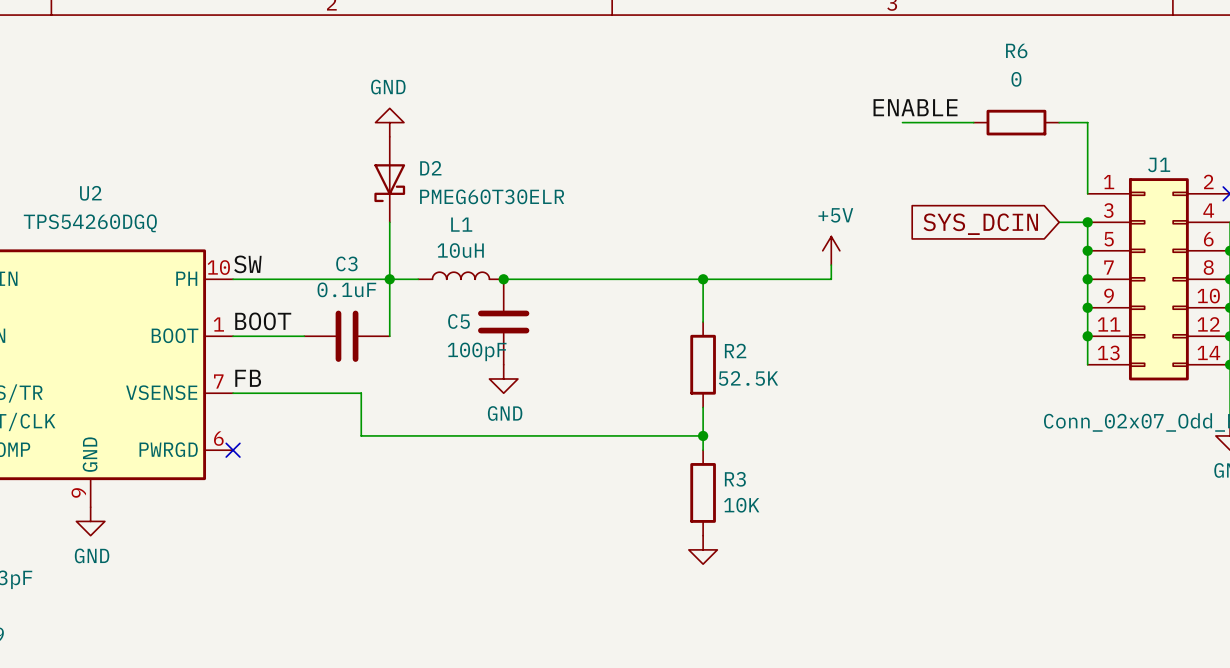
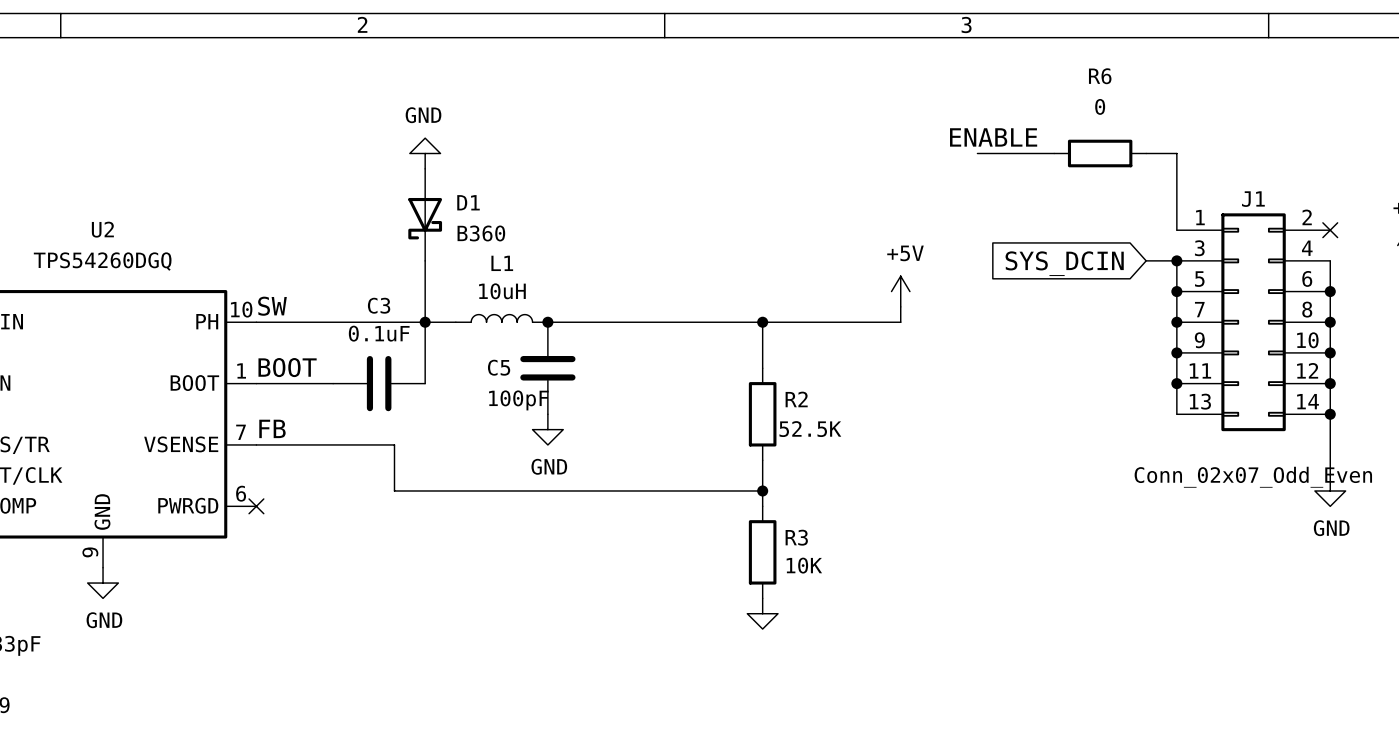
D2: PMEG60T30ELR (389, 179) -> none
D1: none -> B360 (425, 214)

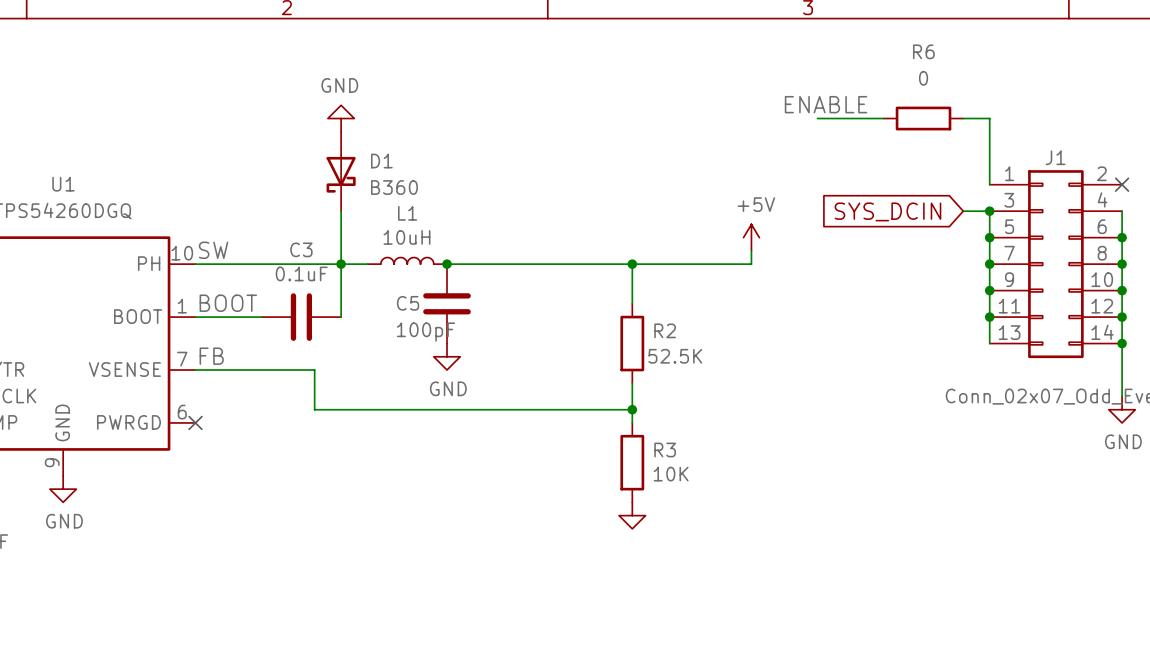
U2 name: U2 (102, 229) -> U1 (63, 184)

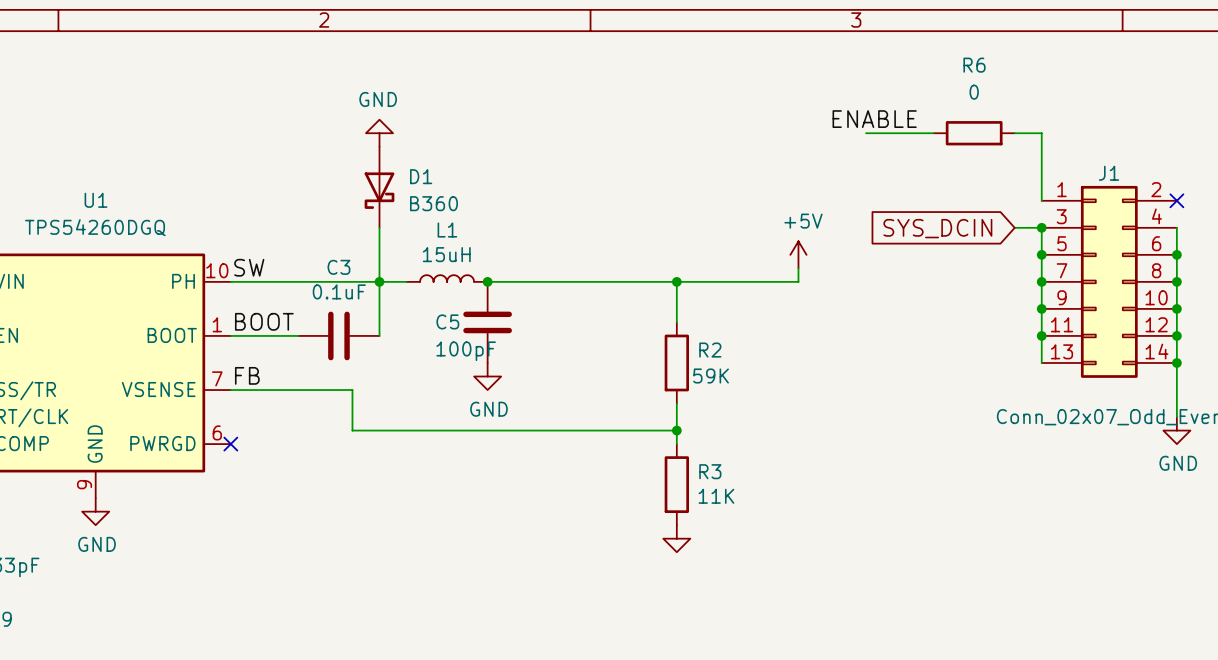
L1 value: 10uH (406, 237) -> 15uH (446, 254)
R2 value: 52.5K (675, 356) -> 59K (711, 376)
R3 value: 10K (671, 474) -> 11K (716, 496)

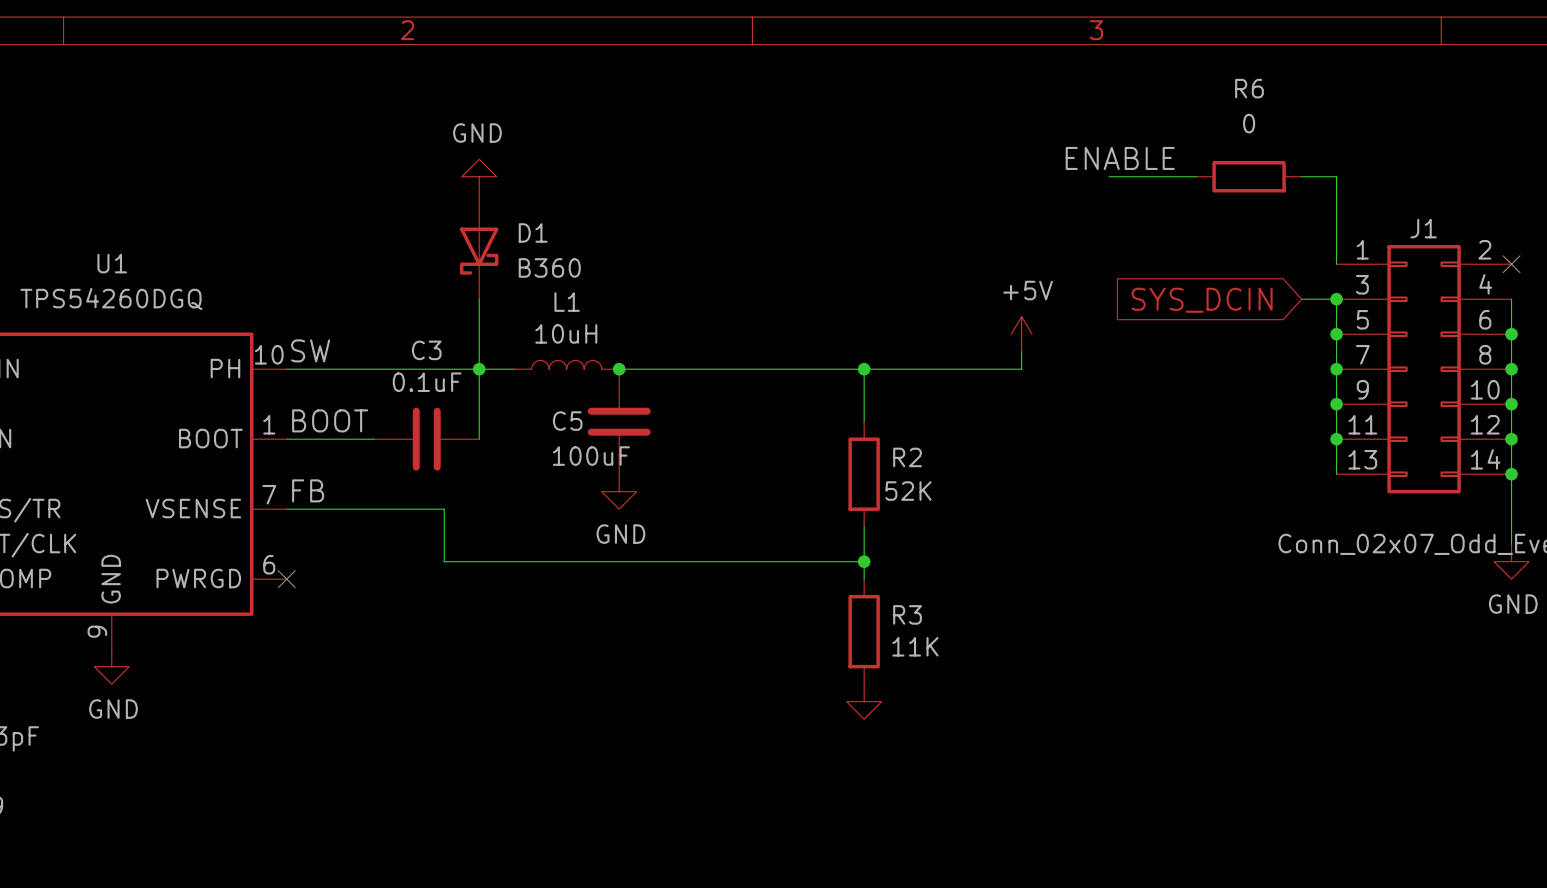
L1 value: 15uH (446, 254) -> 10uH (566, 333)
C5 value: 100pF (466, 351) -> 100uF (591, 456)
R2 value: 59K (711, 376) -> 52K (908, 491)

